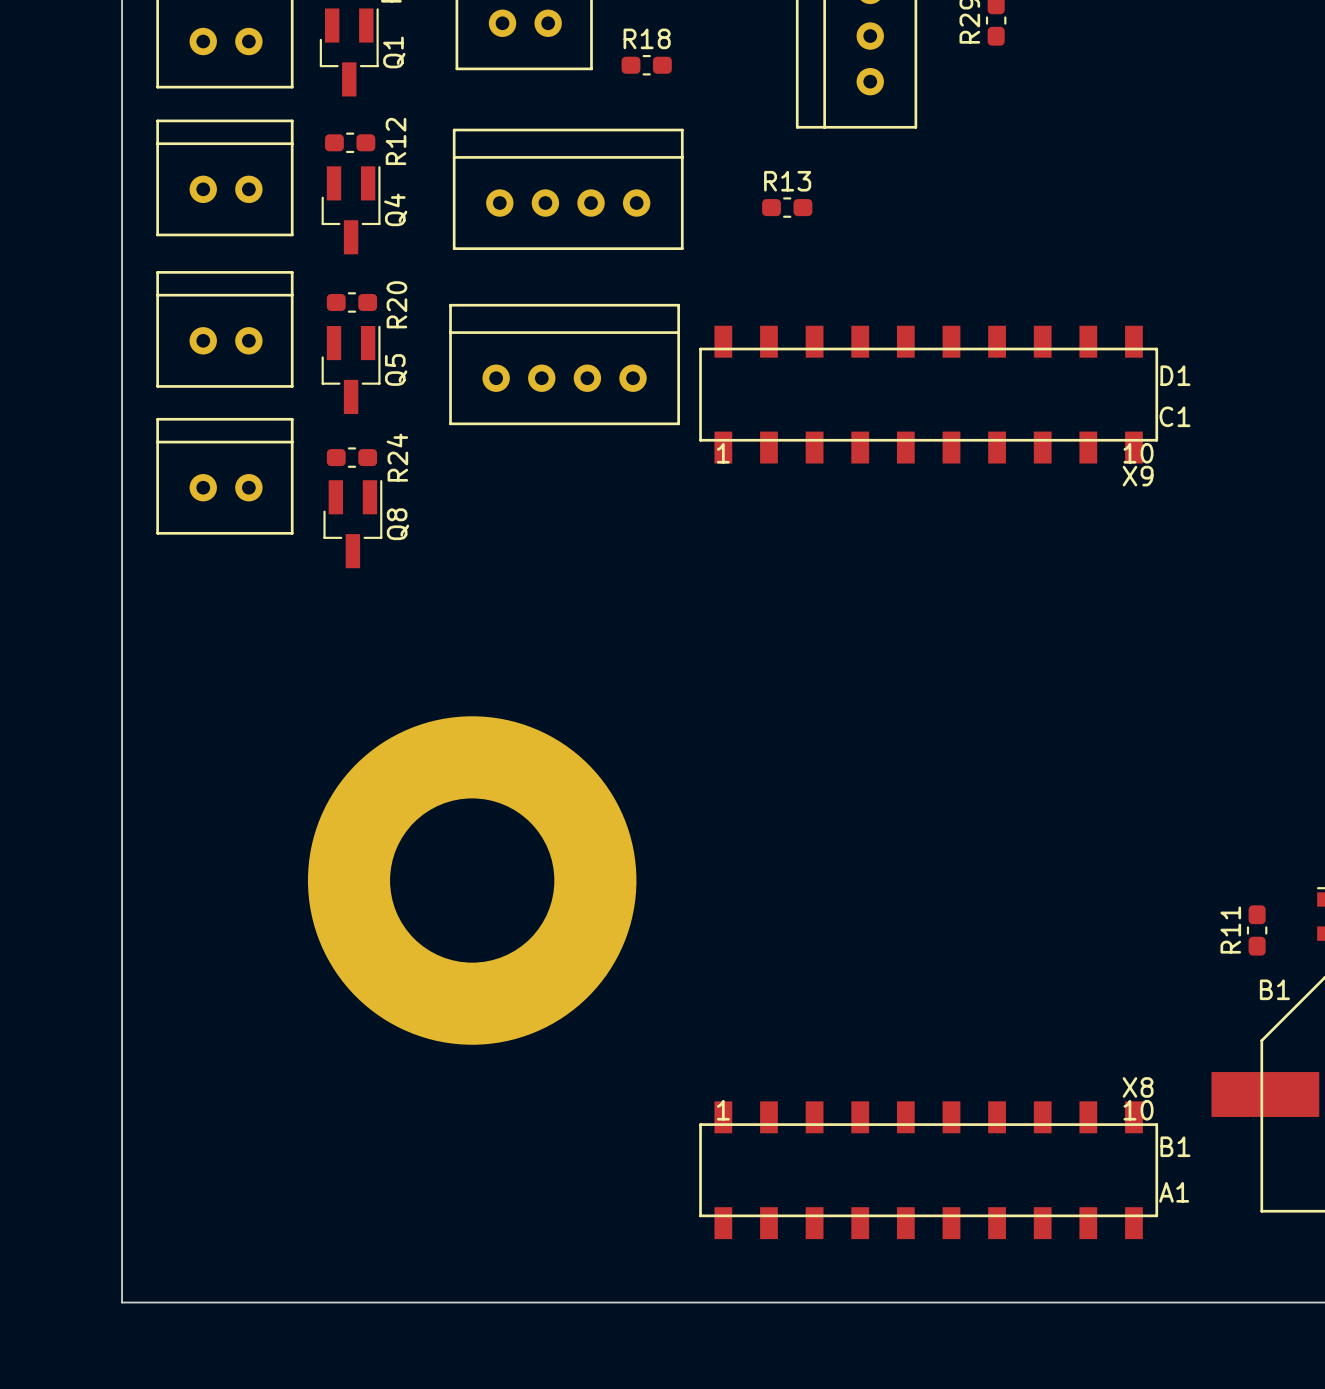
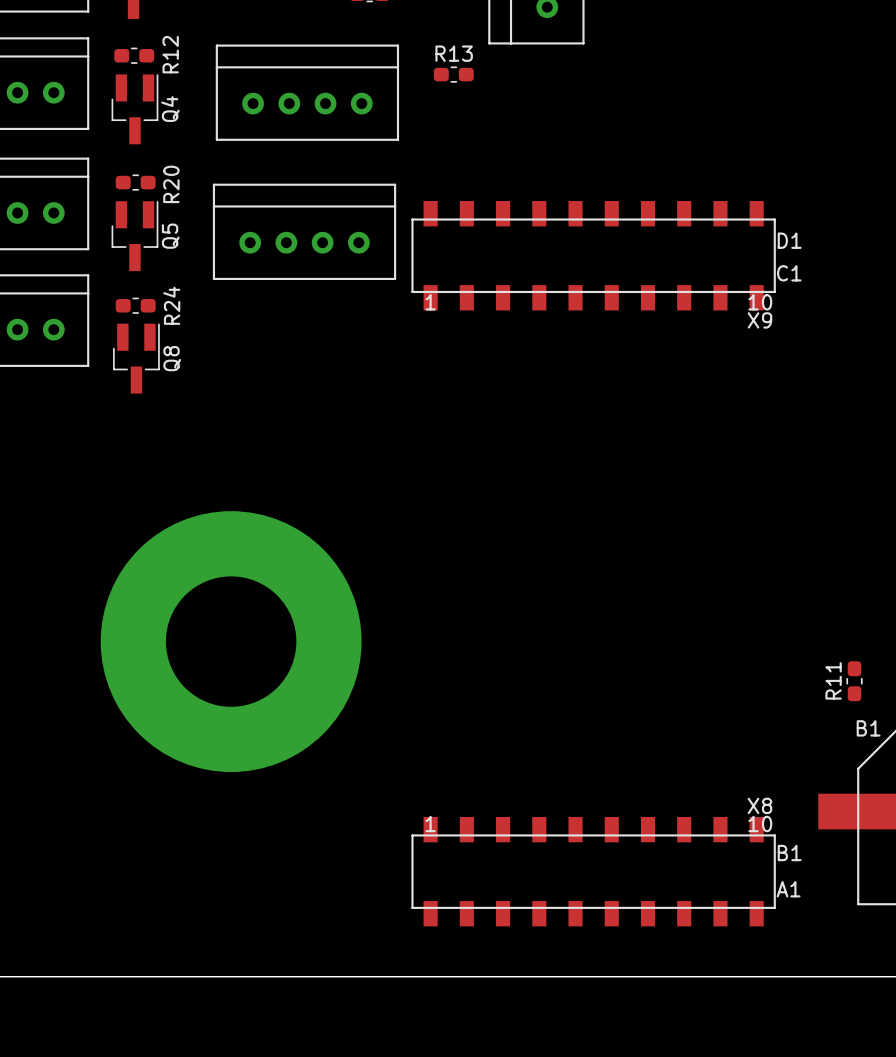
R13 position: (787, 207) -> (453, 74)

